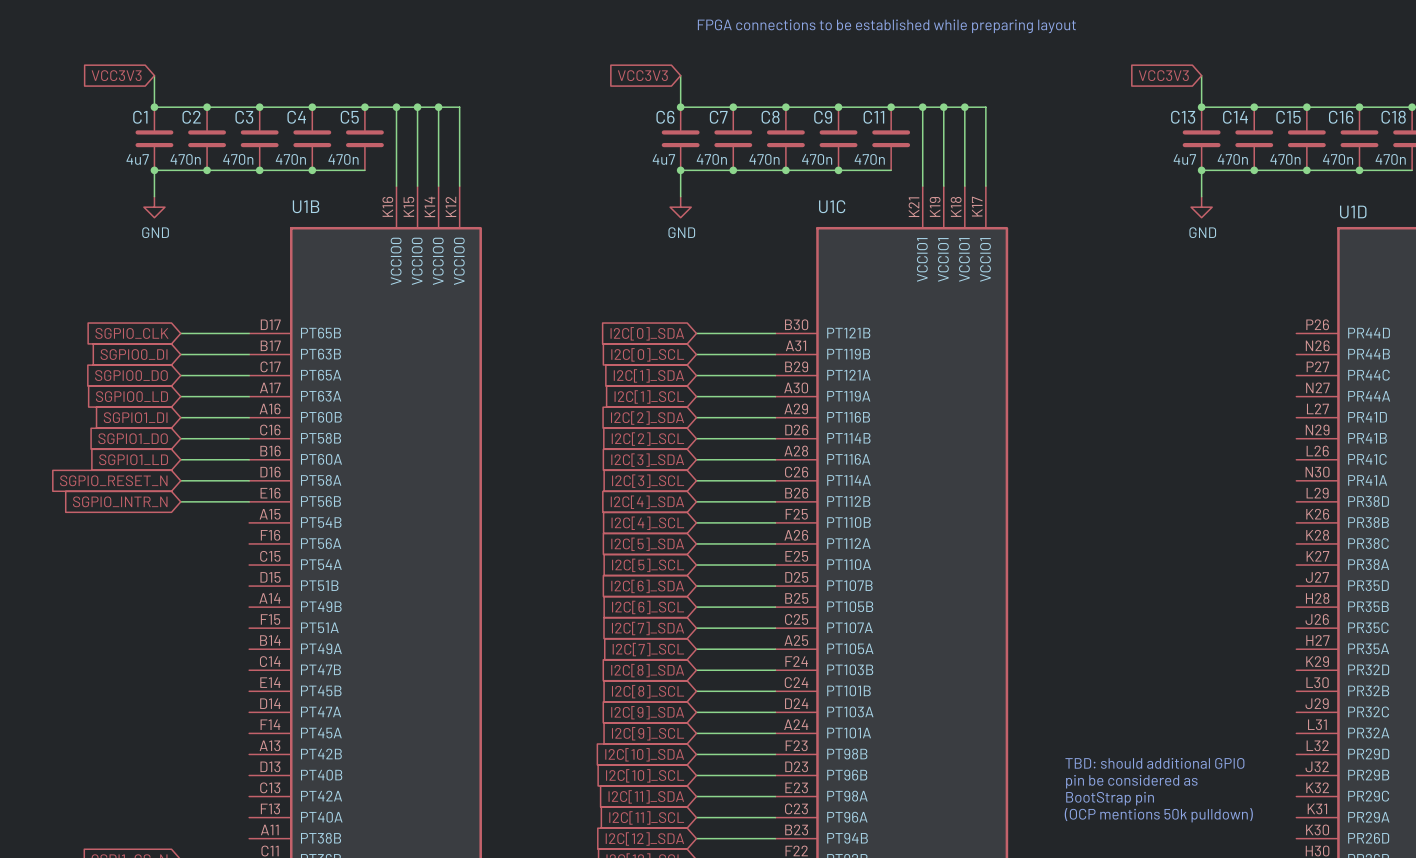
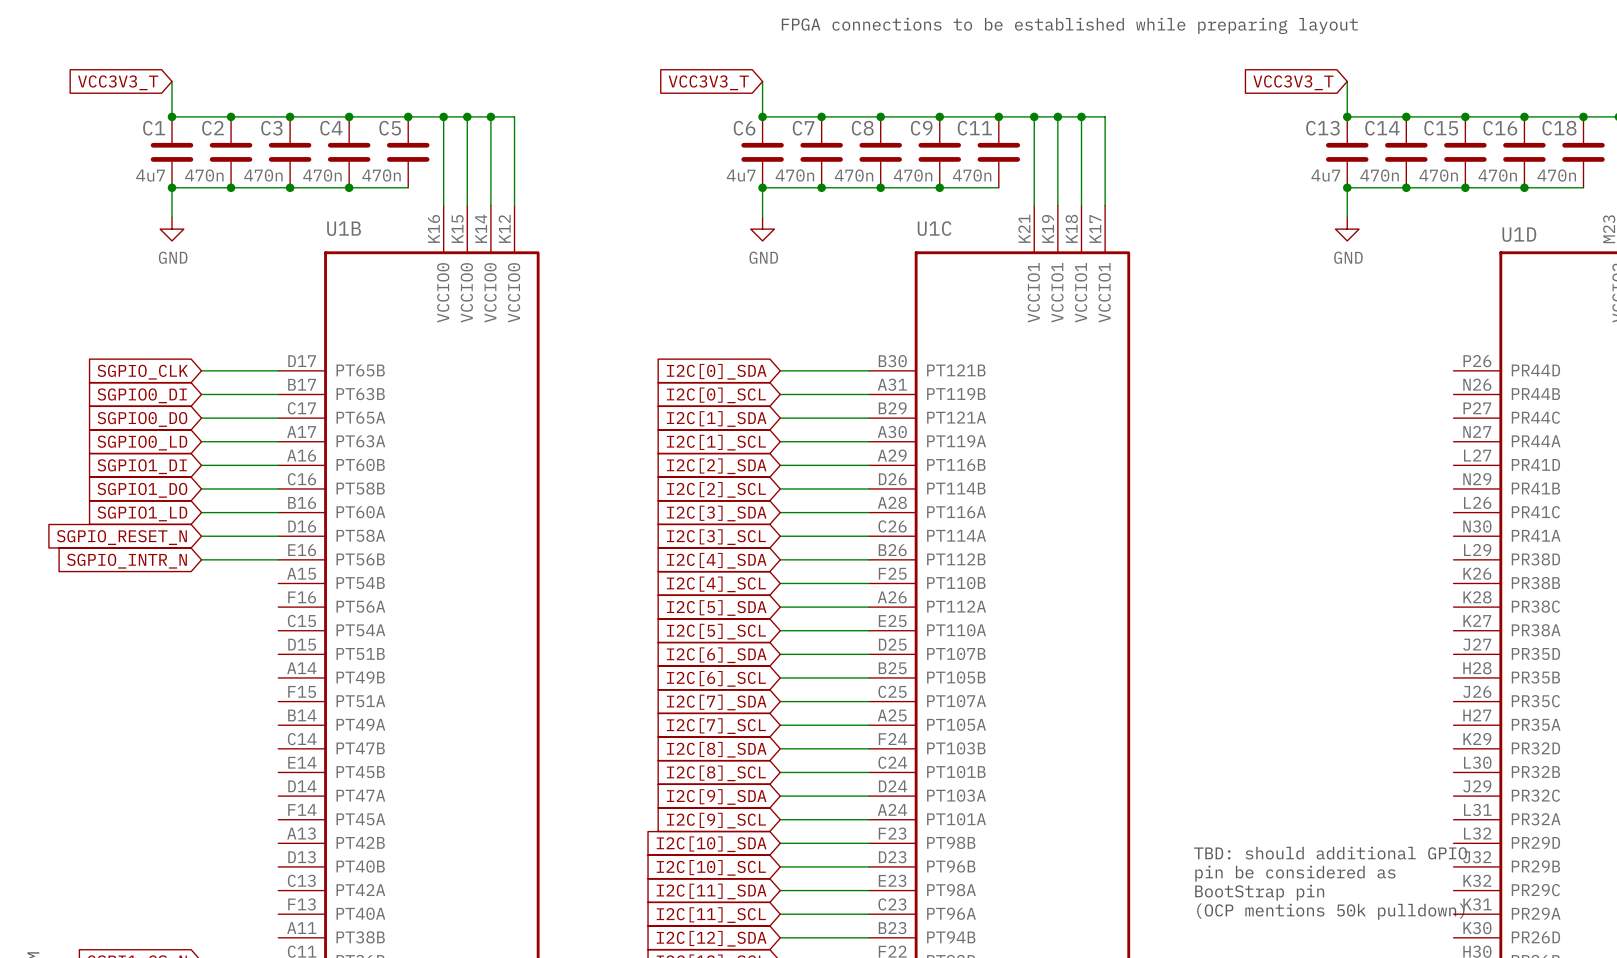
global label: VCC3V3 (116, 75) -> VCC3V3_T (118, 82)
global label: VCC3V3 (642, 75) -> VCC3V3_T (708, 82)
global label: VCC3V3 (1163, 75) -> VCC3V3_T (1293, 82)

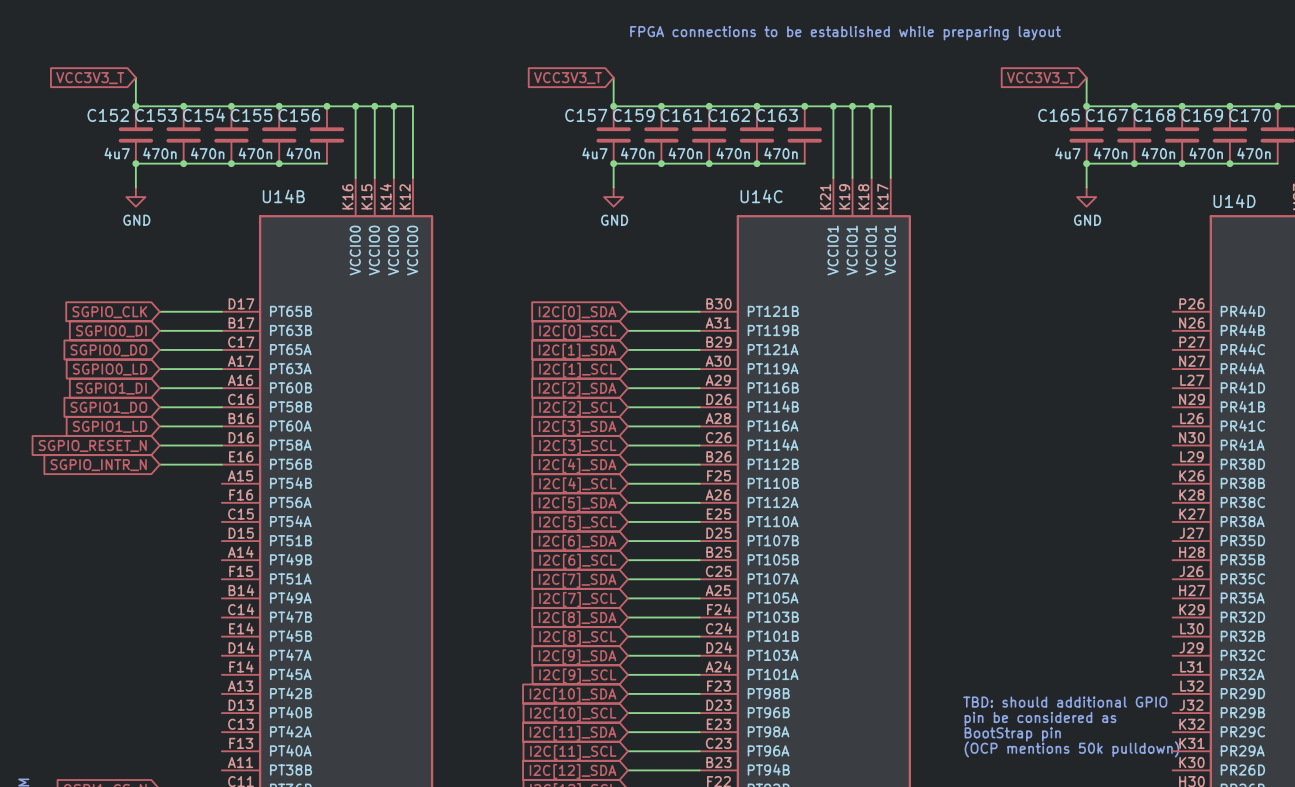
C1 name: C1 (154, 128) -> C152 (108, 115)
C2 name: C2 (213, 128) -> C153 (156, 115)
C3 name: C3 (271, 128) -> C154 (204, 115)
C4 name: C4 (331, 128) -> C155 (251, 115)
C5 name: C5 (390, 128) -> C156 (299, 115)
C6 name: C6 (744, 128) -> C157 (586, 115)
C7 name: C7 (803, 128) -> C159 (633, 115)
C8 name: C8 (862, 128) -> C161 (681, 115)
C9 name: C9 (921, 128) -> C162 (729, 115)
C11 name: C11 (974, 128) -> C163 (777, 115)
C13 name: C13 (1322, 128) -> C165 (1058, 115)
C14 name: C14 (1382, 128) -> C167 (1107, 115)
C15 name: C15 (1441, 128) -> C168 (1154, 115)
C16 name: C16 (1500, 128) -> C169 (1202, 115)
C18 name: C18 (1559, 128) -> C170 (1250, 115)
U1B name: U1B (344, 228) -> U14B (283, 196)
U1C name: U1C (934, 228) -> U14C (761, 196)
U1D name: U1D (1519, 234) -> U14D (1234, 201)

